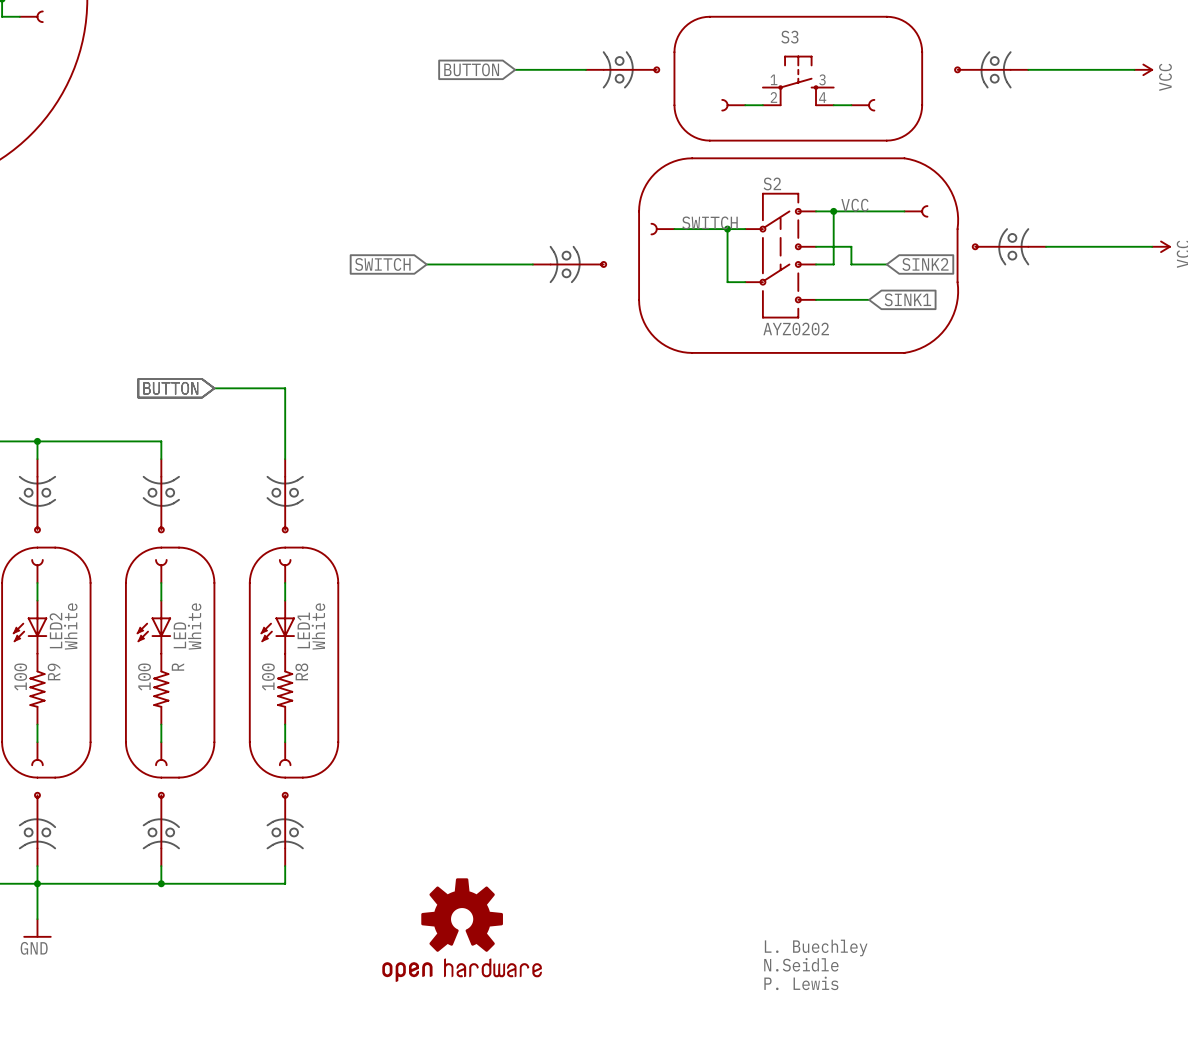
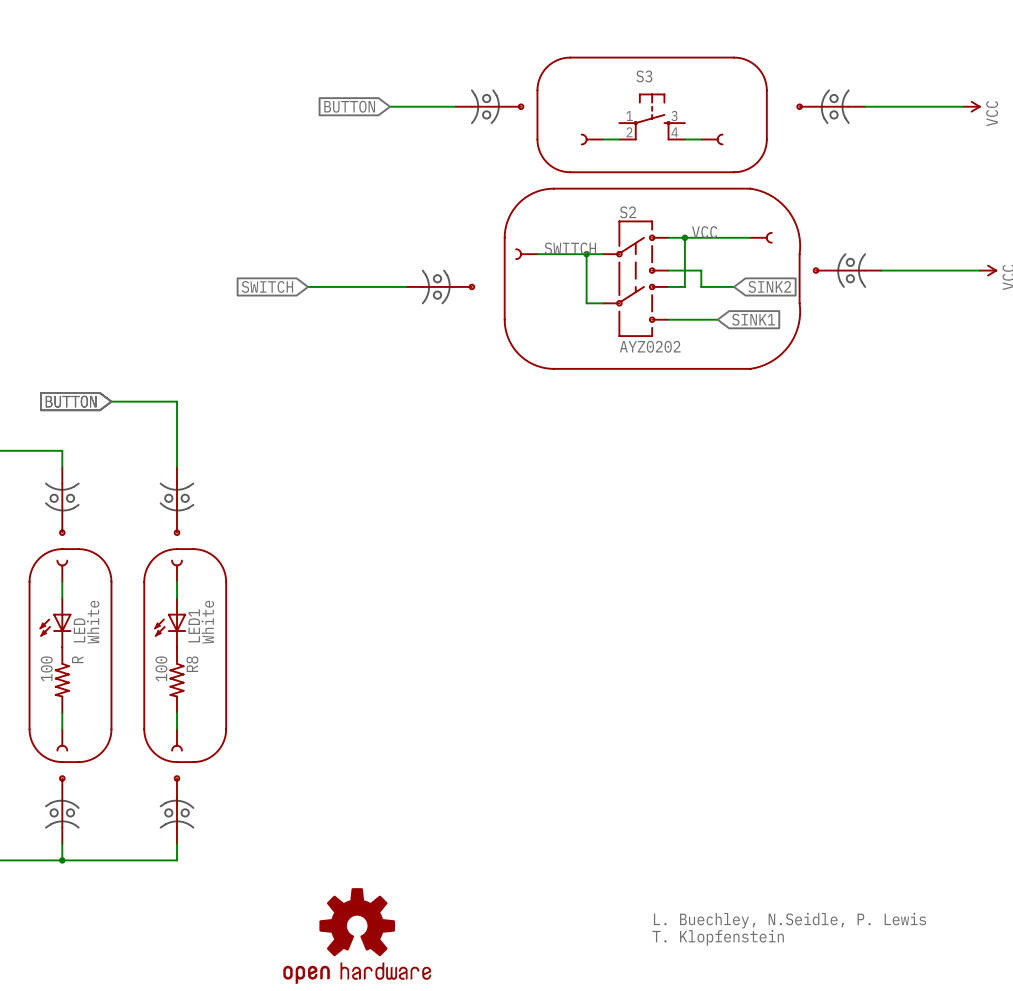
part position: (462, 930) -> (357, 936)
text: L. Buechley (816, 947) -> none
text: none -> L. Buechley, N.Seidle, P. Lewis (790, 920)
text: N.Seidle (801, 964) -> none
text: none -> T. Klopfenstein (718, 937)
text: P. Lewis (801, 983) -> none

